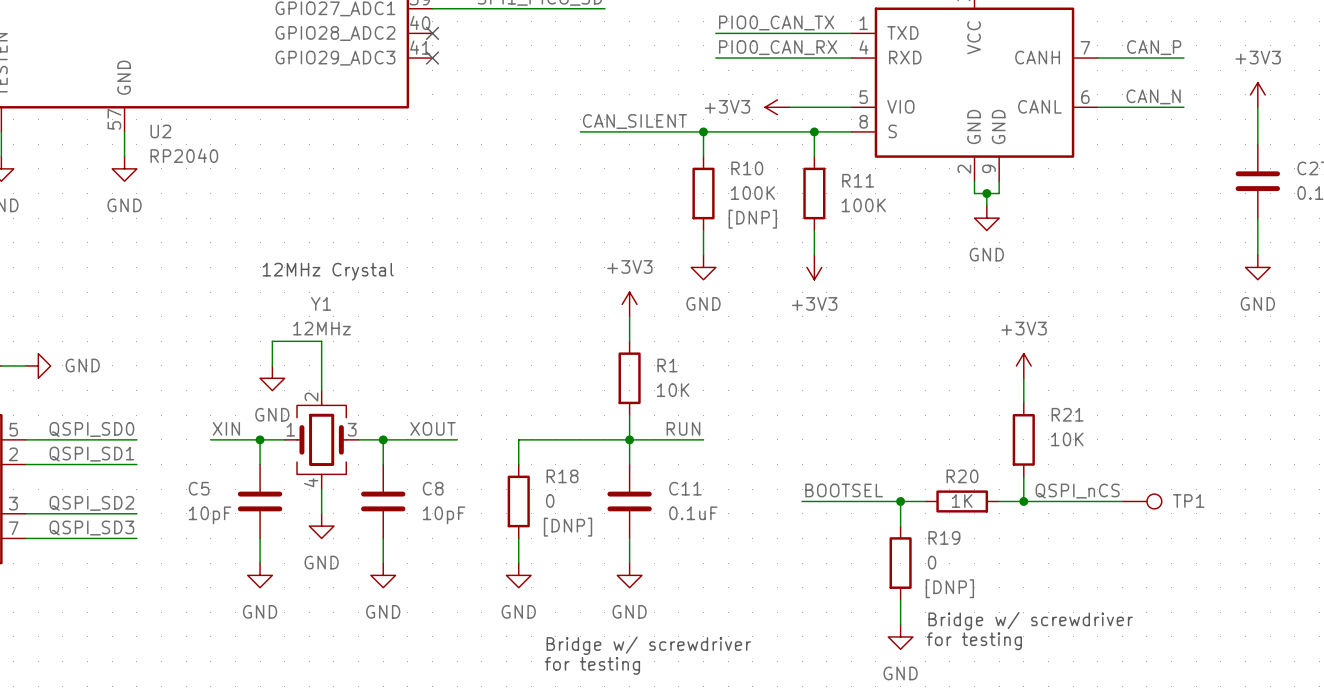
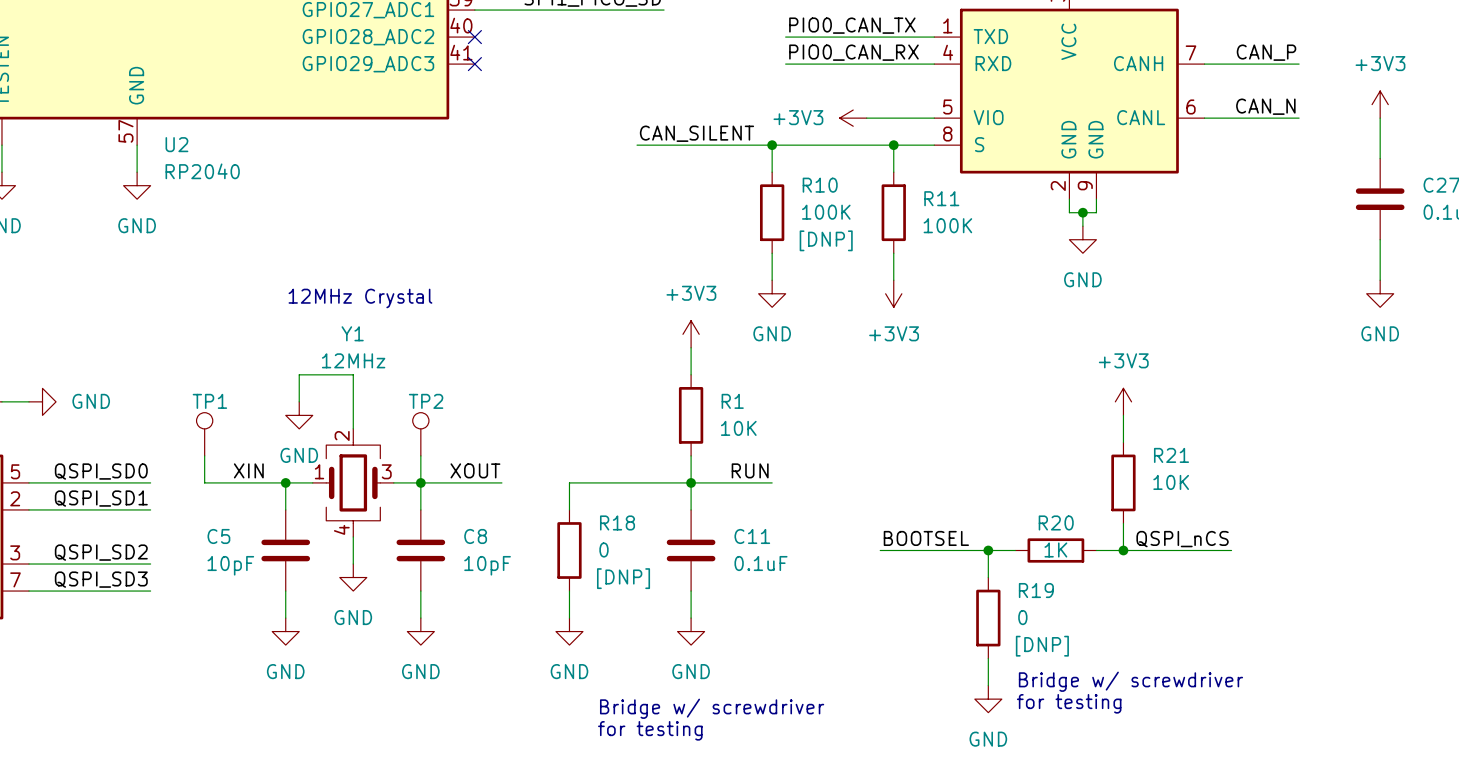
TP2: none -> (420, 434)
wire: none -> (204, 455) (204, 482) (231, 482)
wire: none -> (420, 455) (420, 482)
TP1 position: (1142, 501) -> (204, 434)
TP1 rotation: 0° (1154, 501) -> 90° counterclockwise (204, 420)
TP1 name position: TP1 (1188, 501) -> TP1 (209, 401)

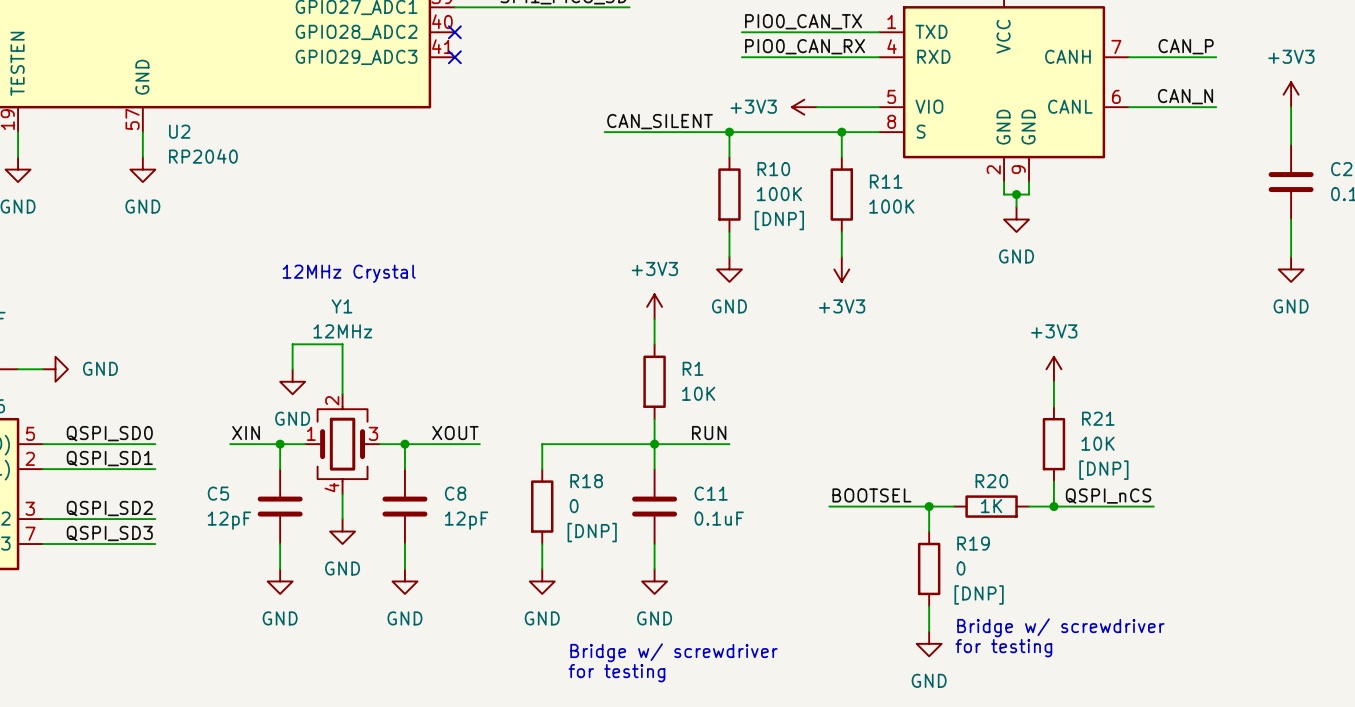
TP1: (204, 434) -> none
TP2: (420, 434) -> none
wire: (204, 455) (204, 482) (231, 482) -> none
wire: (420, 455) (420, 482) -> none
R21 text: none -> [DNP] (1103, 470)
C5 value: 10pF (230, 565) -> 12pF (229, 520)
C8 value: 10pF (487, 565) -> 12pF (466, 520)

